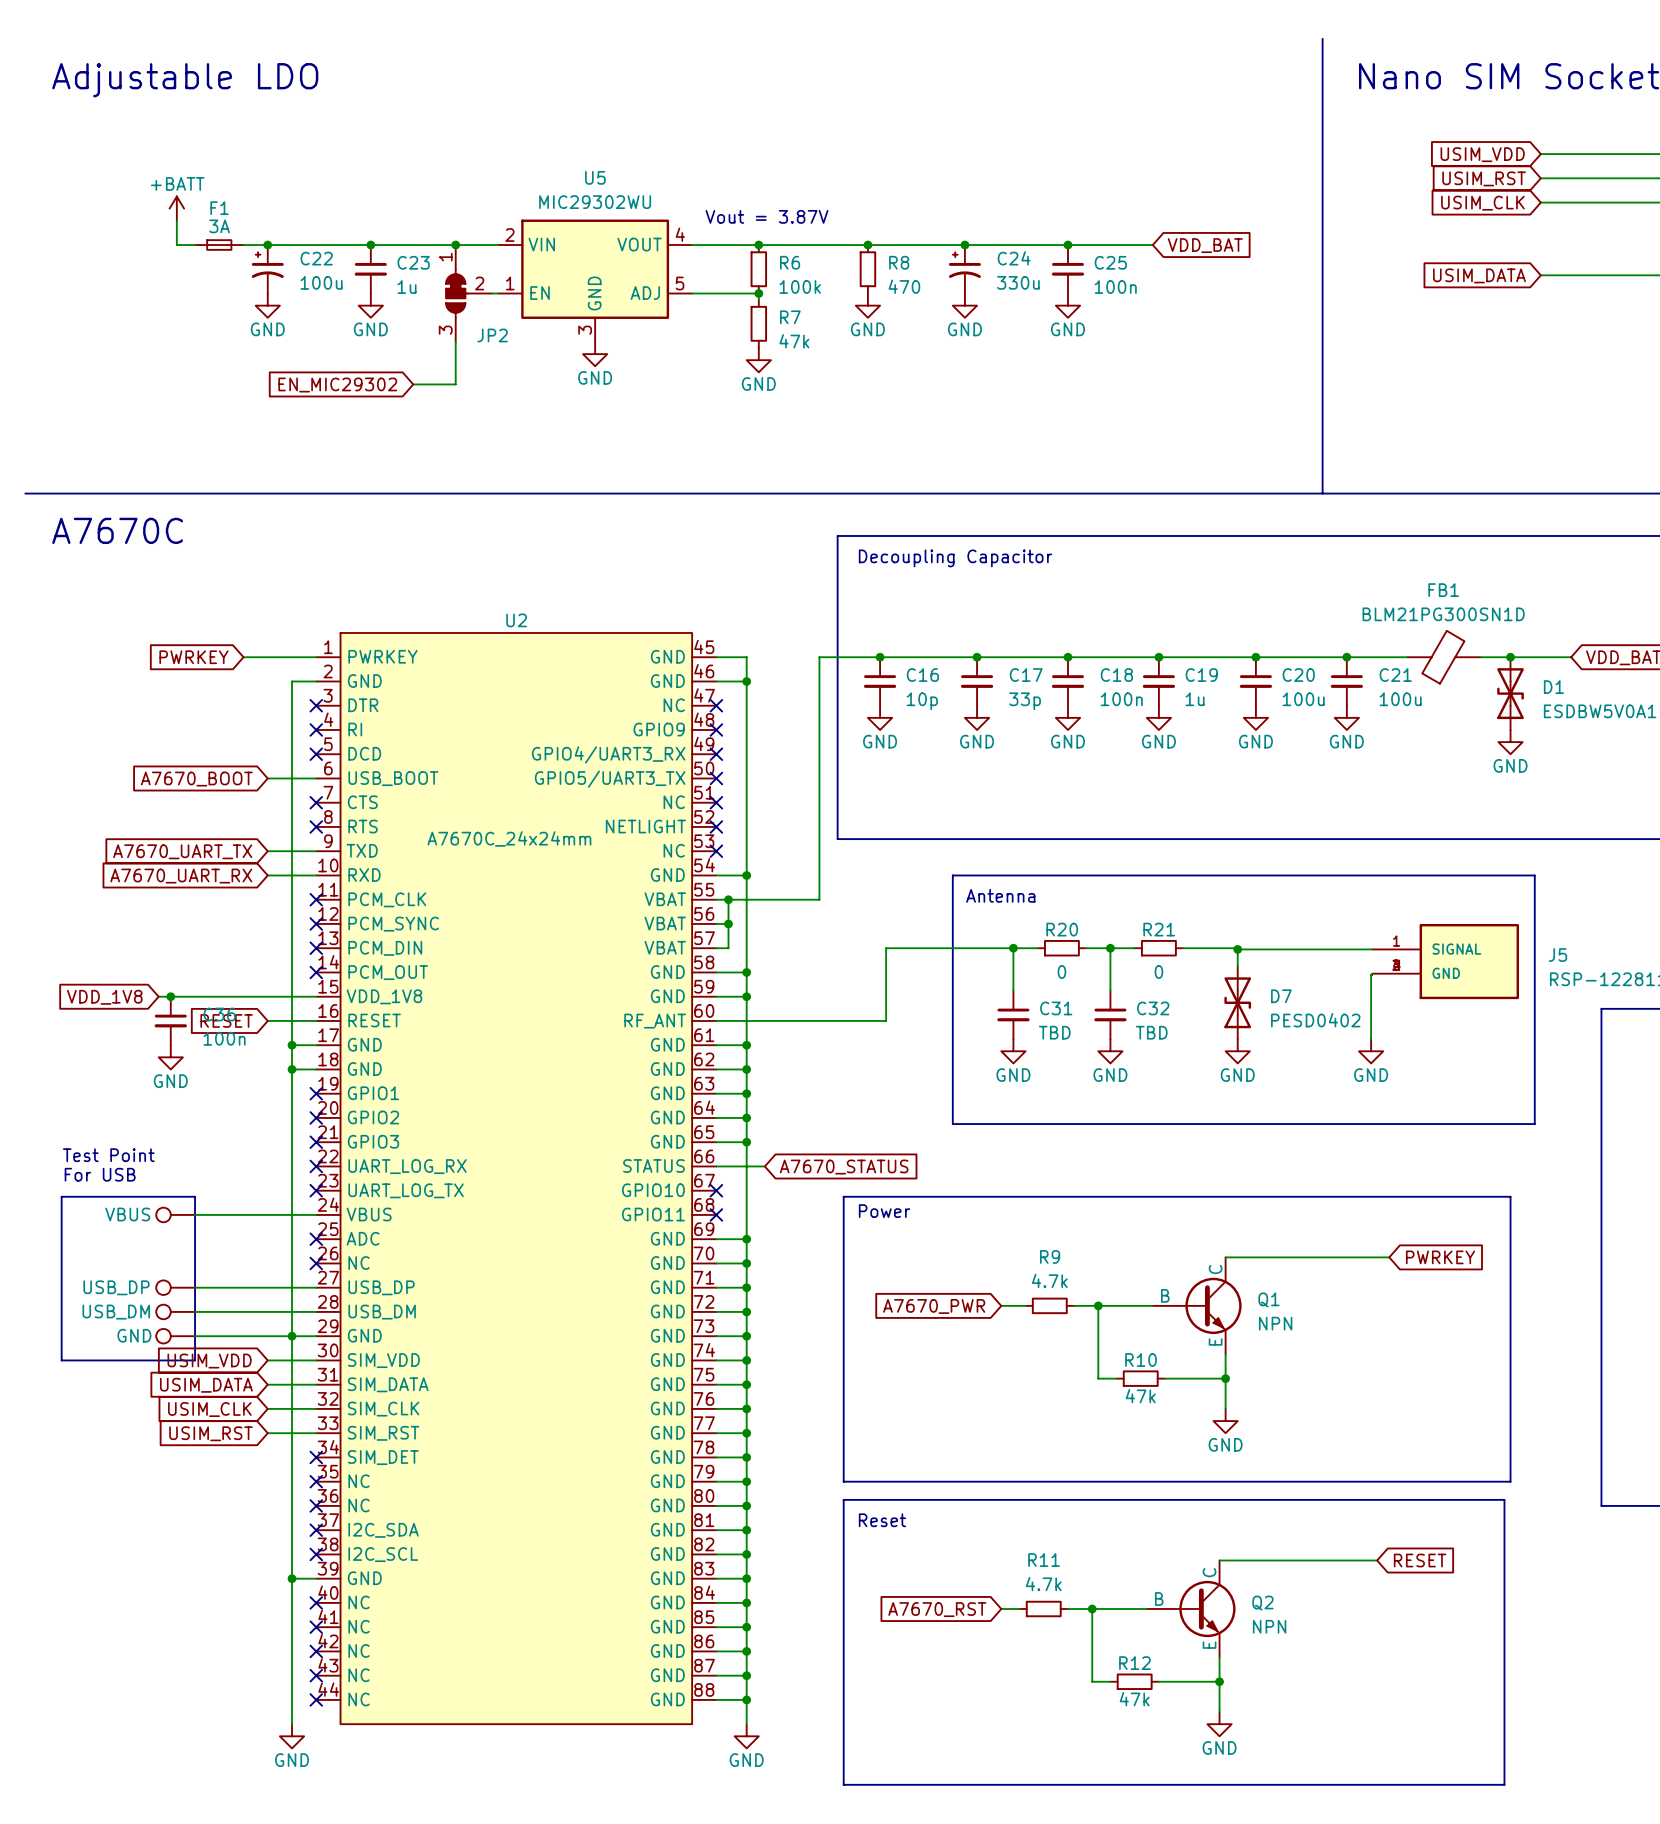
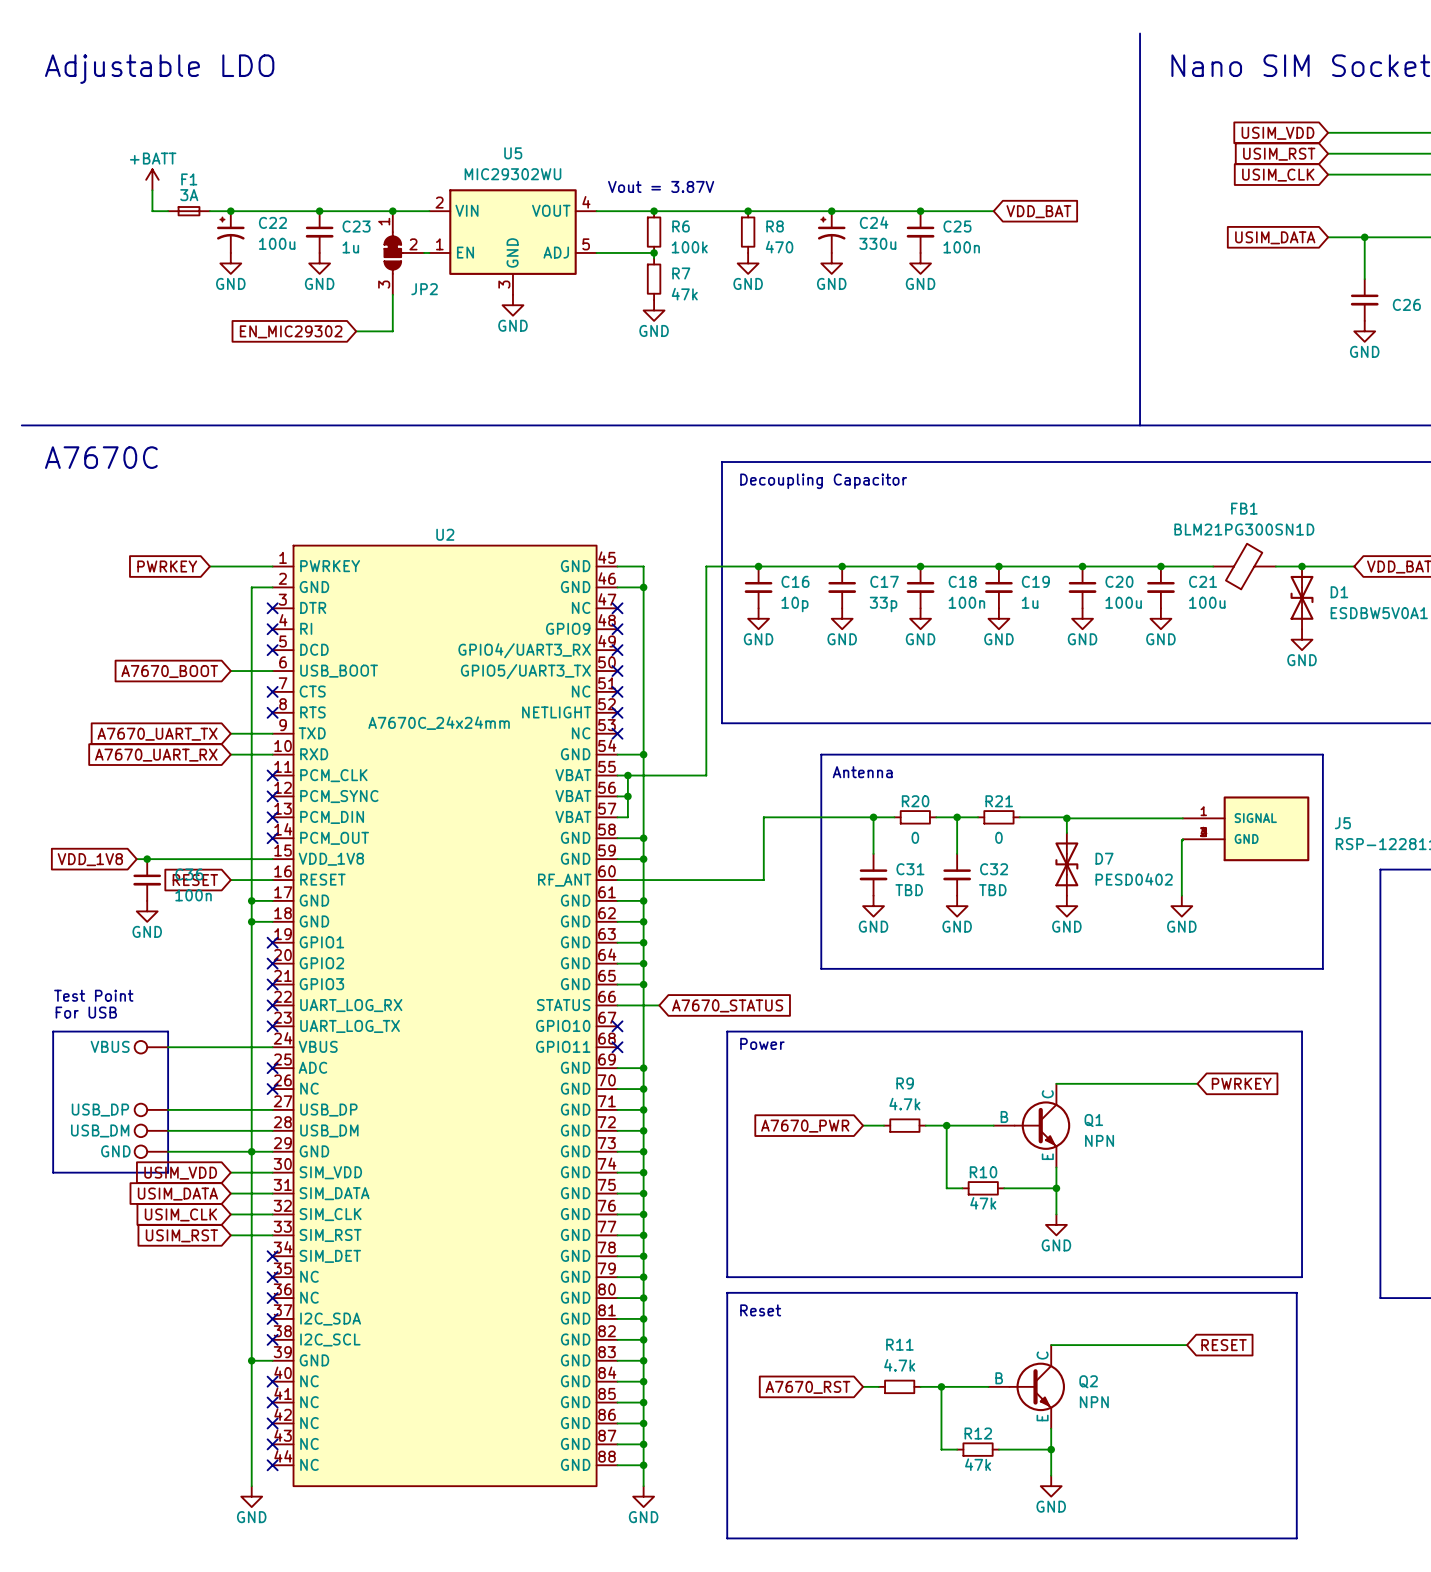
wire: none -> (1364, 237) (1364, 279)
junction: none -> (1364, 237)
C26: none -> (1364, 300)
power symbol: none -> GND (1364, 331)

